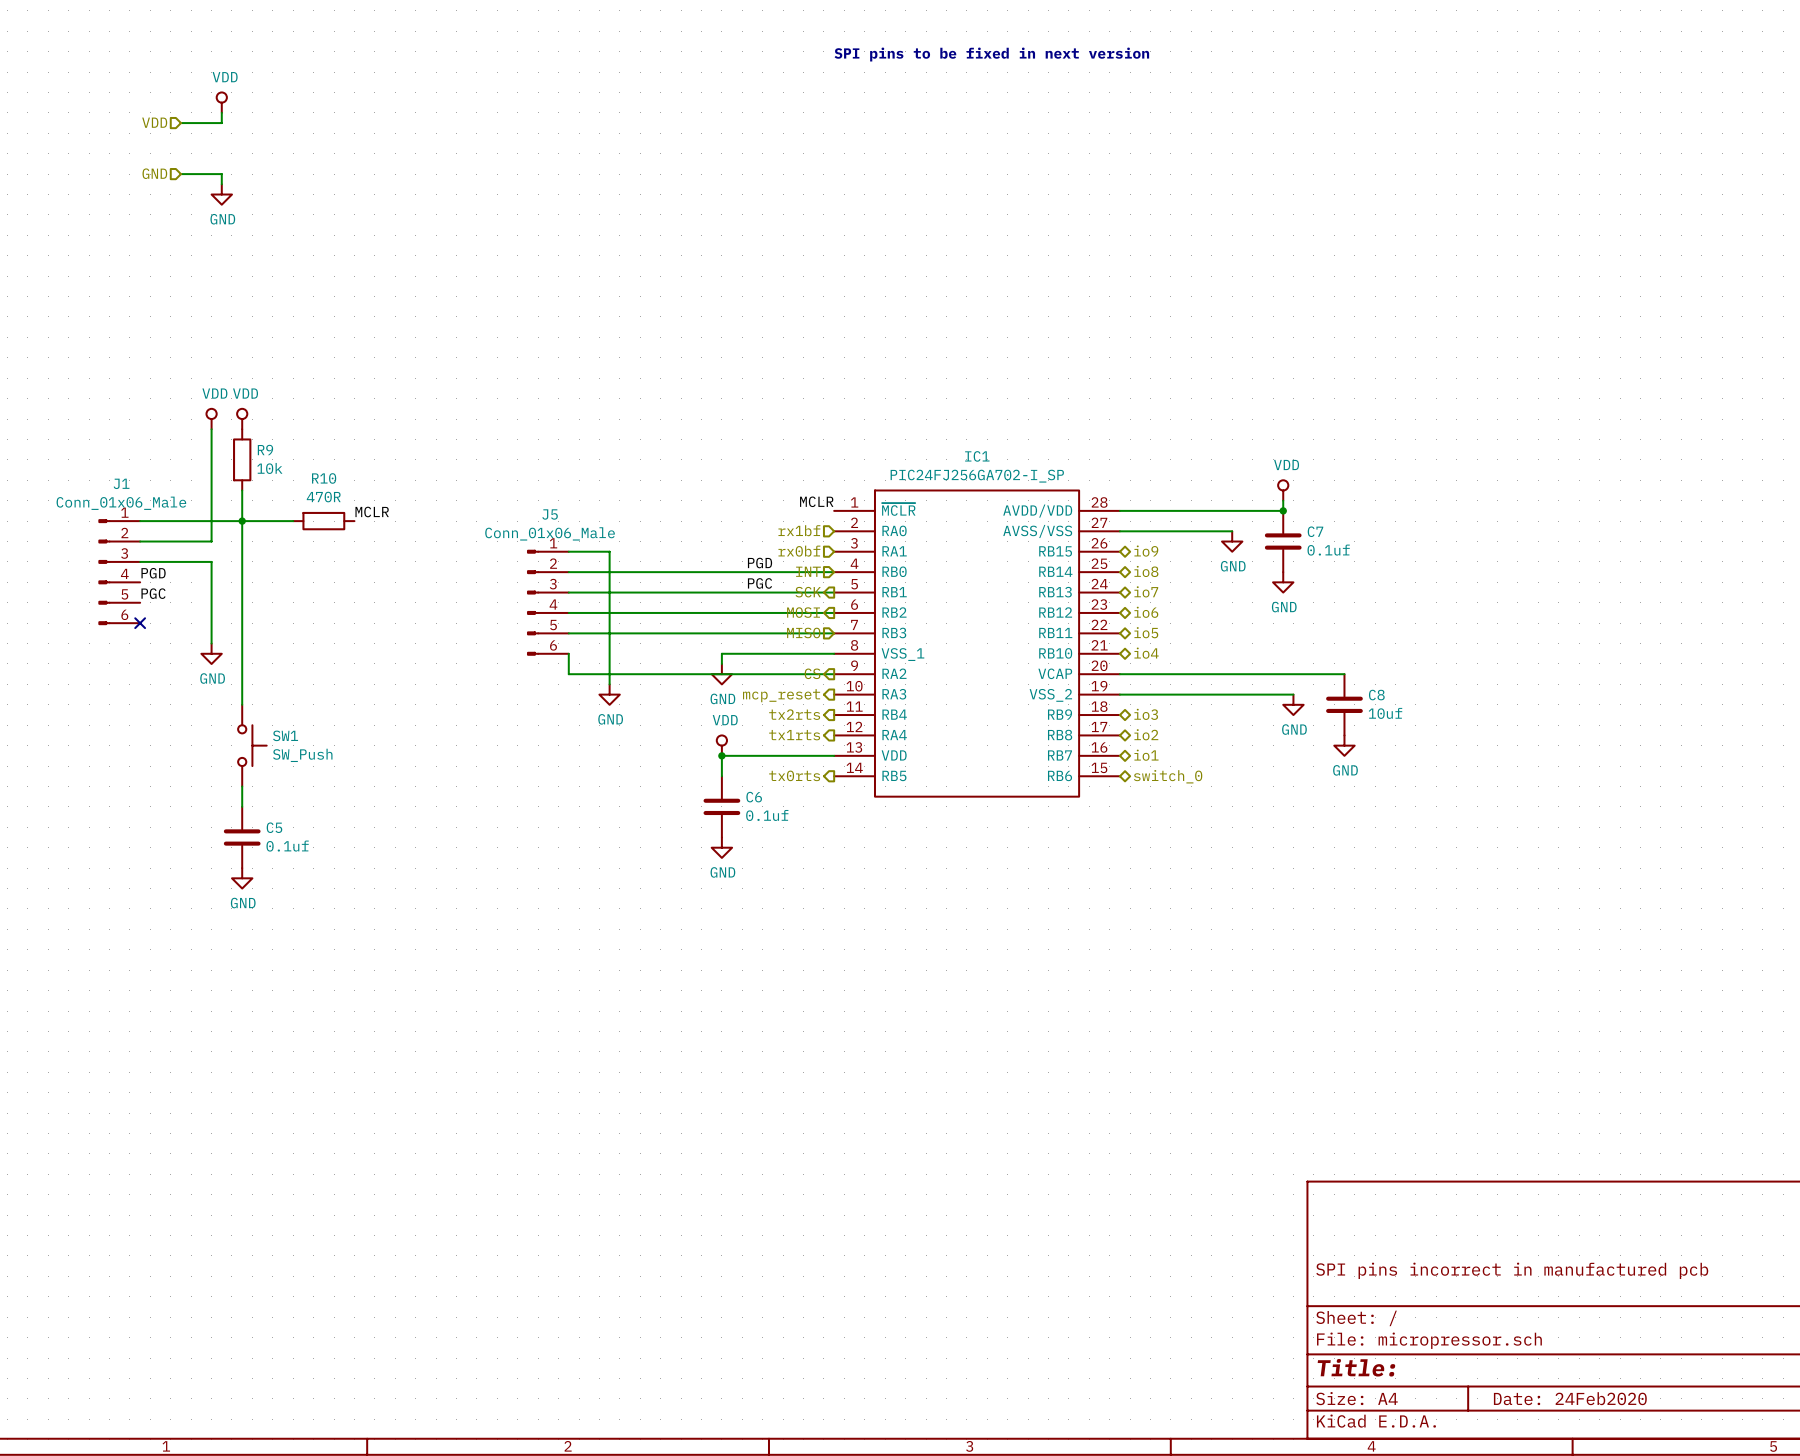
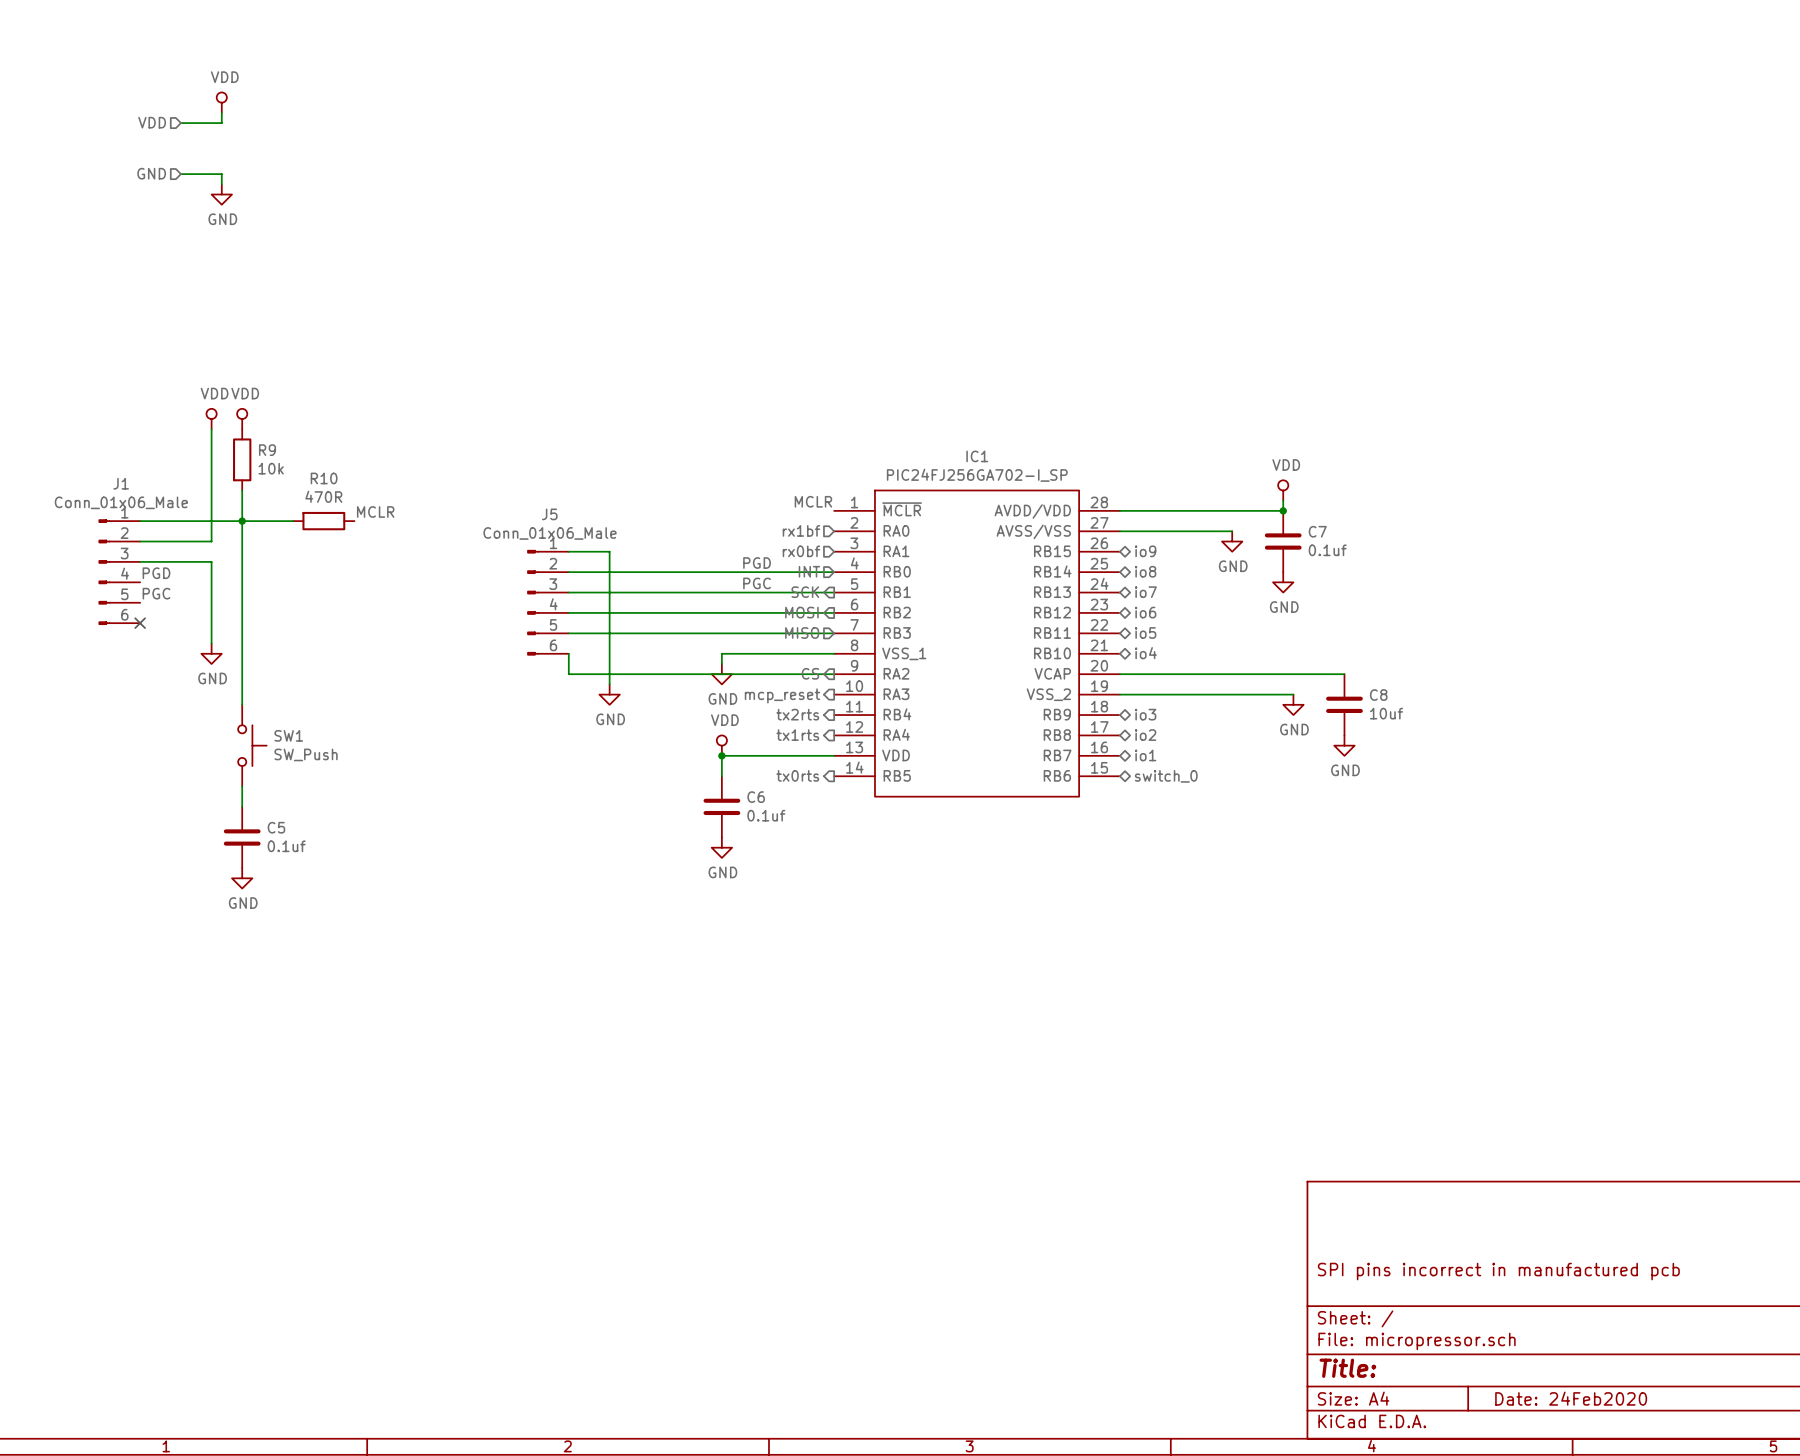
text: SPI pins to be fixed in next version (991, 54) -> none

